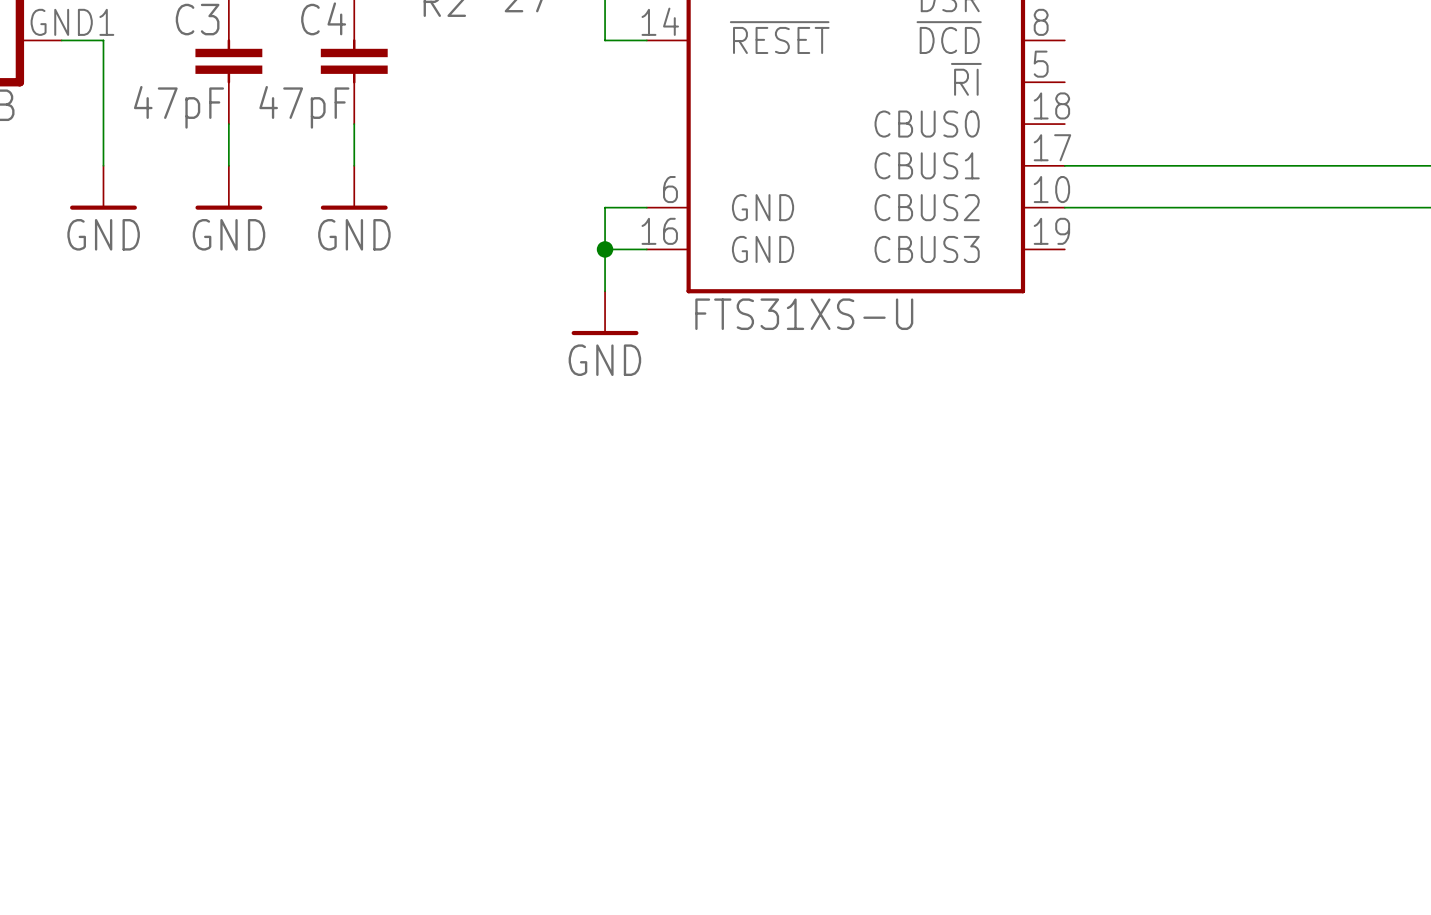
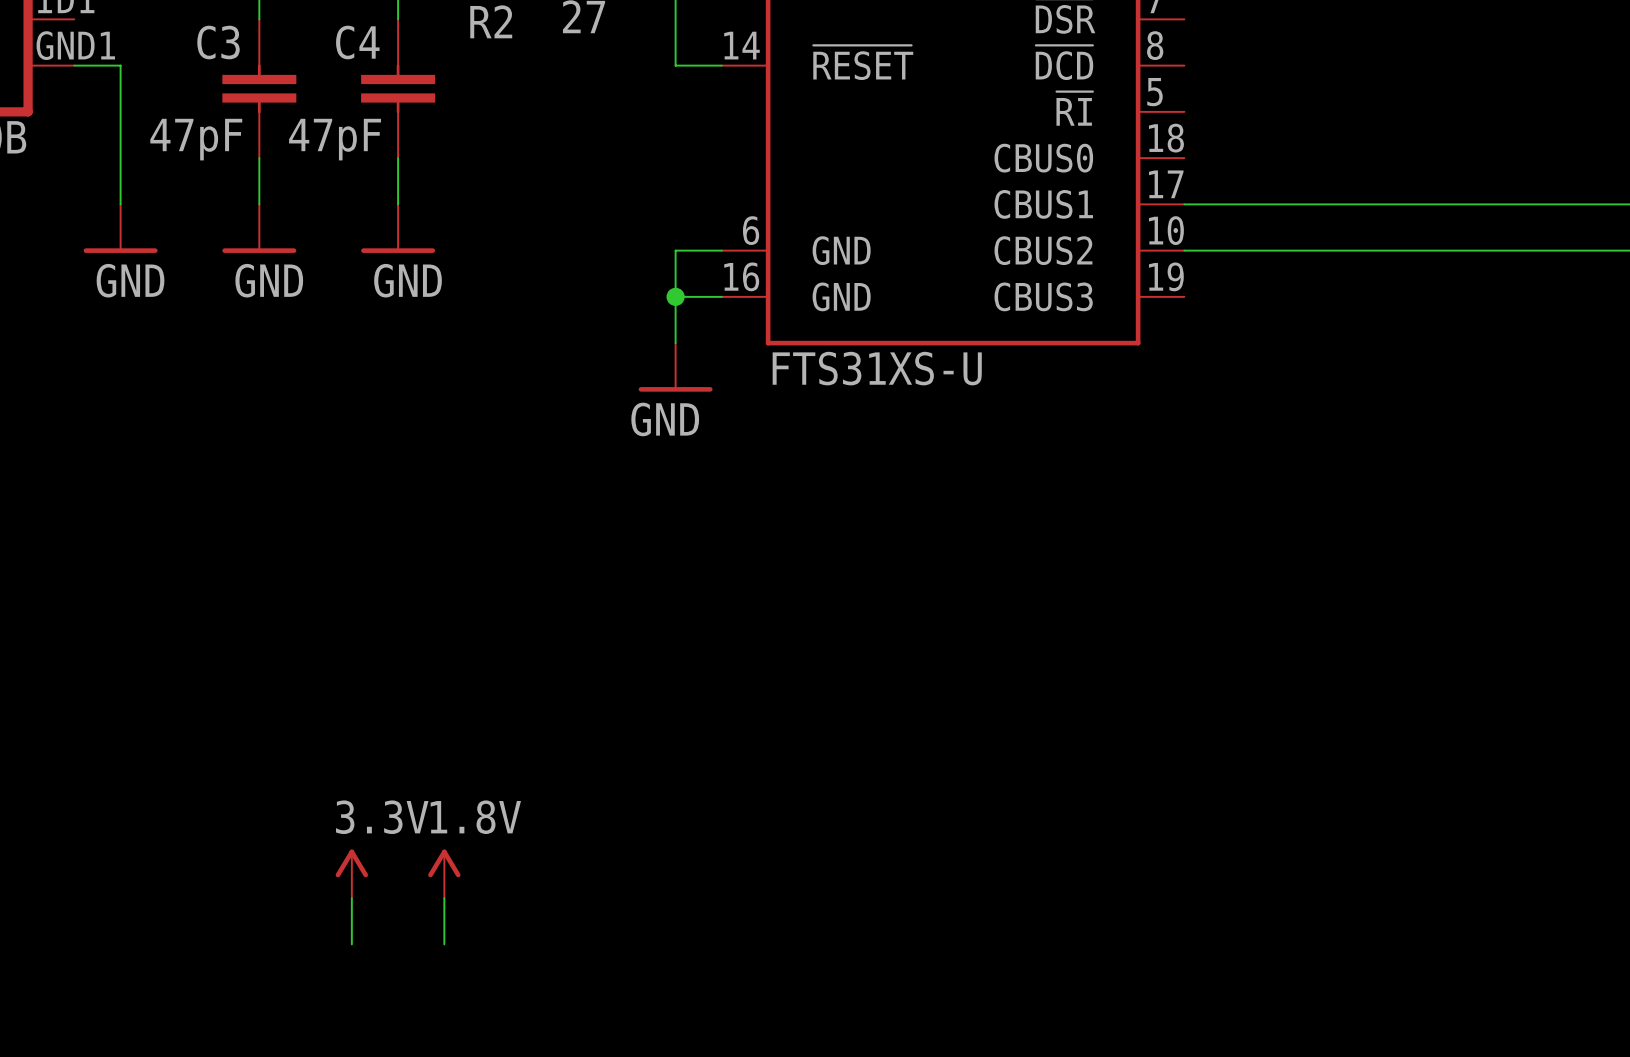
power symbol: none -> 3.3V (351, 873)
power symbol: none -> 1.8V (444, 873)
wire: none -> (351, 898) (351, 944)
wire: none -> (444, 898) (444, 944)

